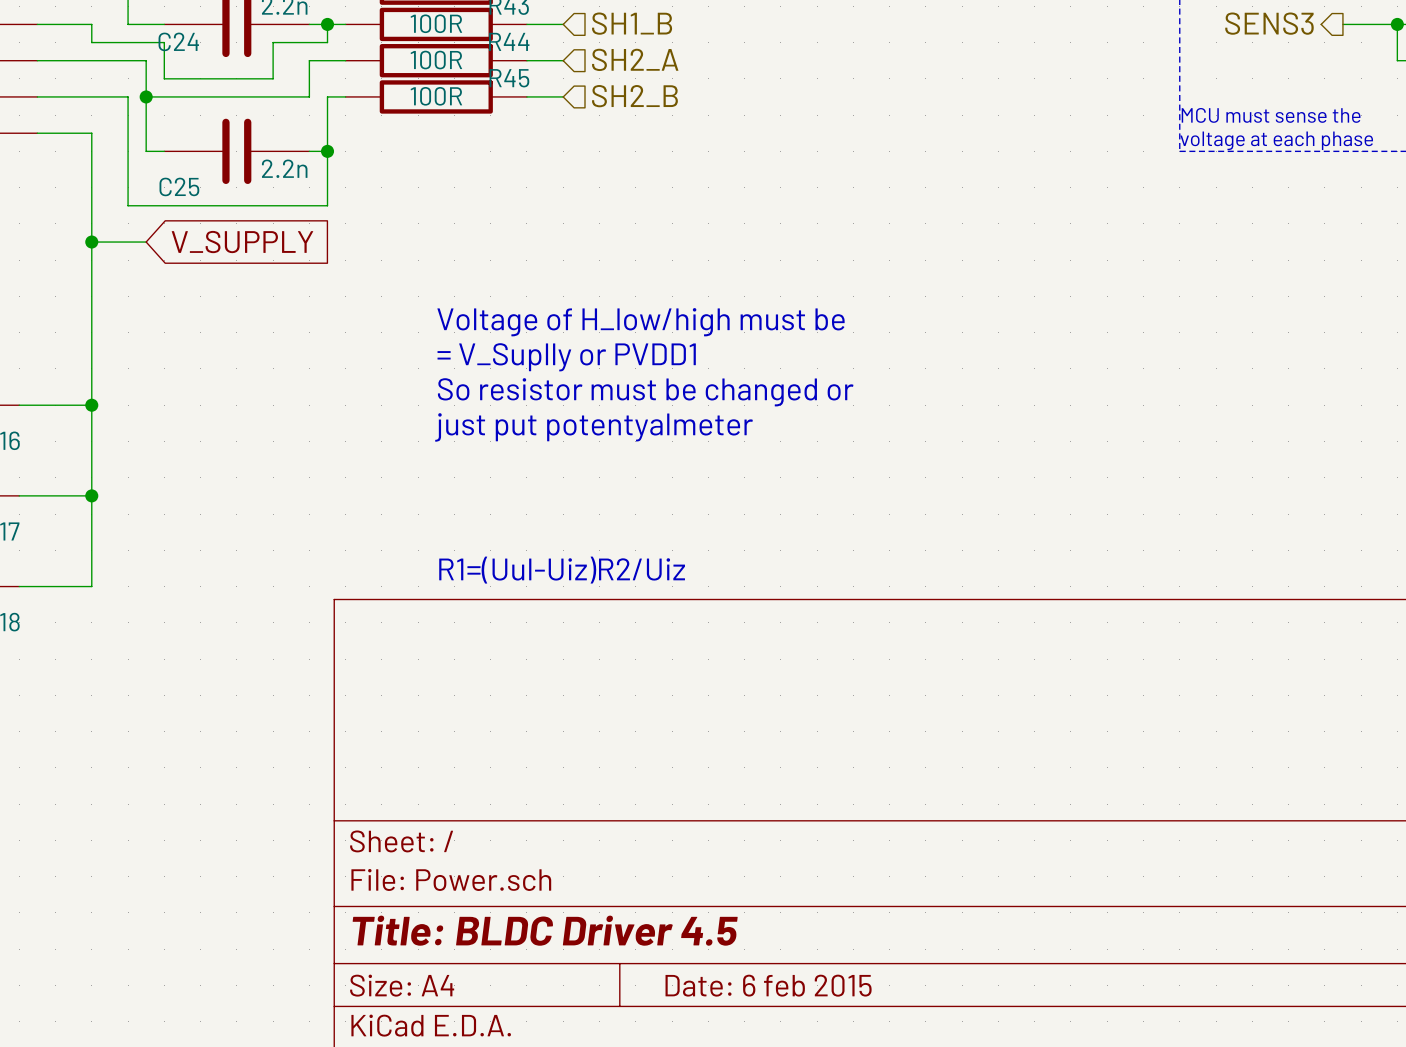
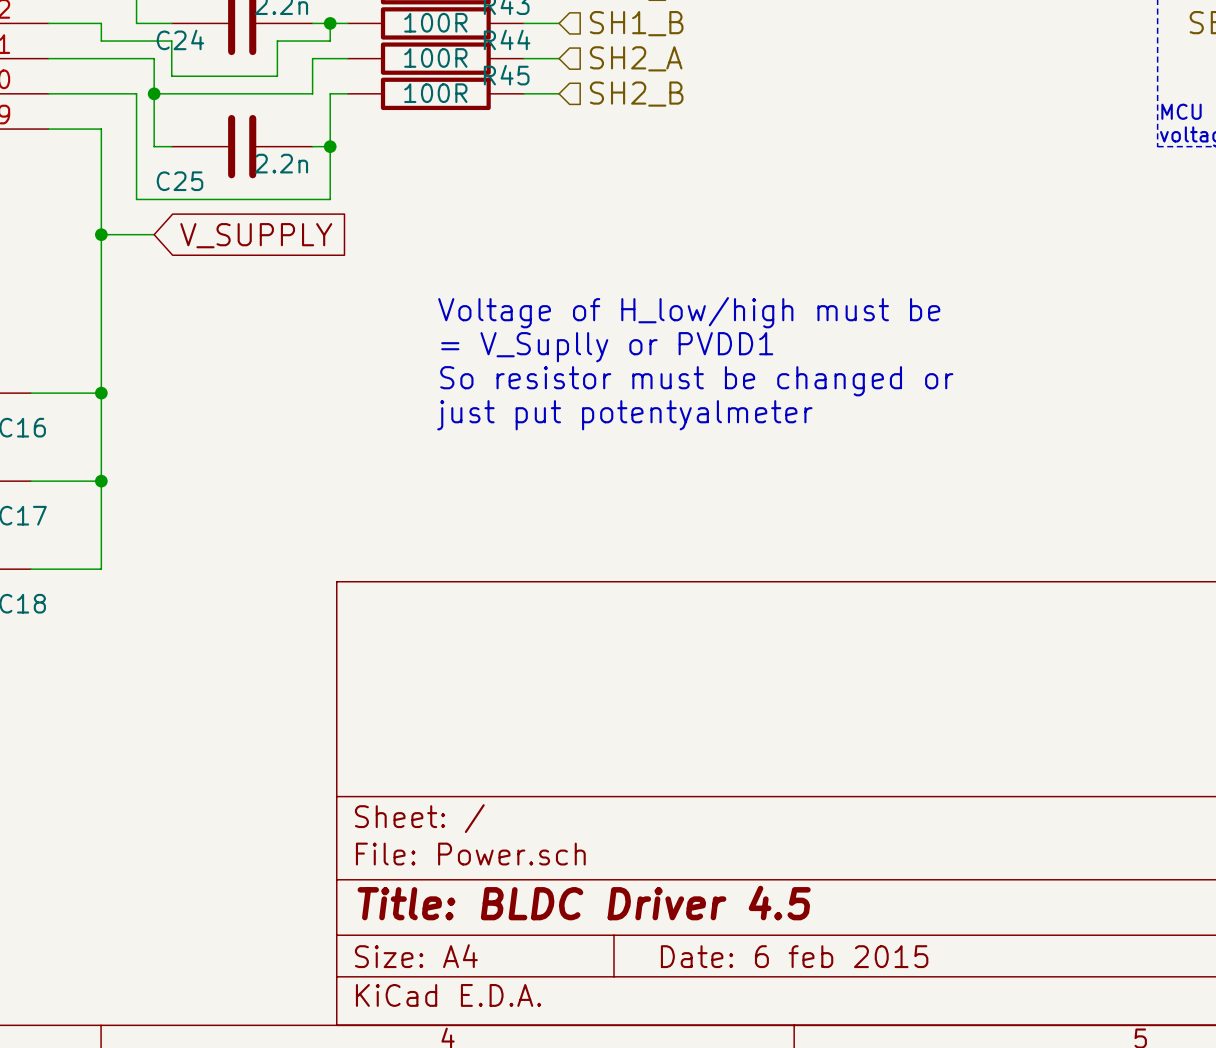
text: R1=(Uul-Uiz)R2/Uiz (562, 570) -> none

